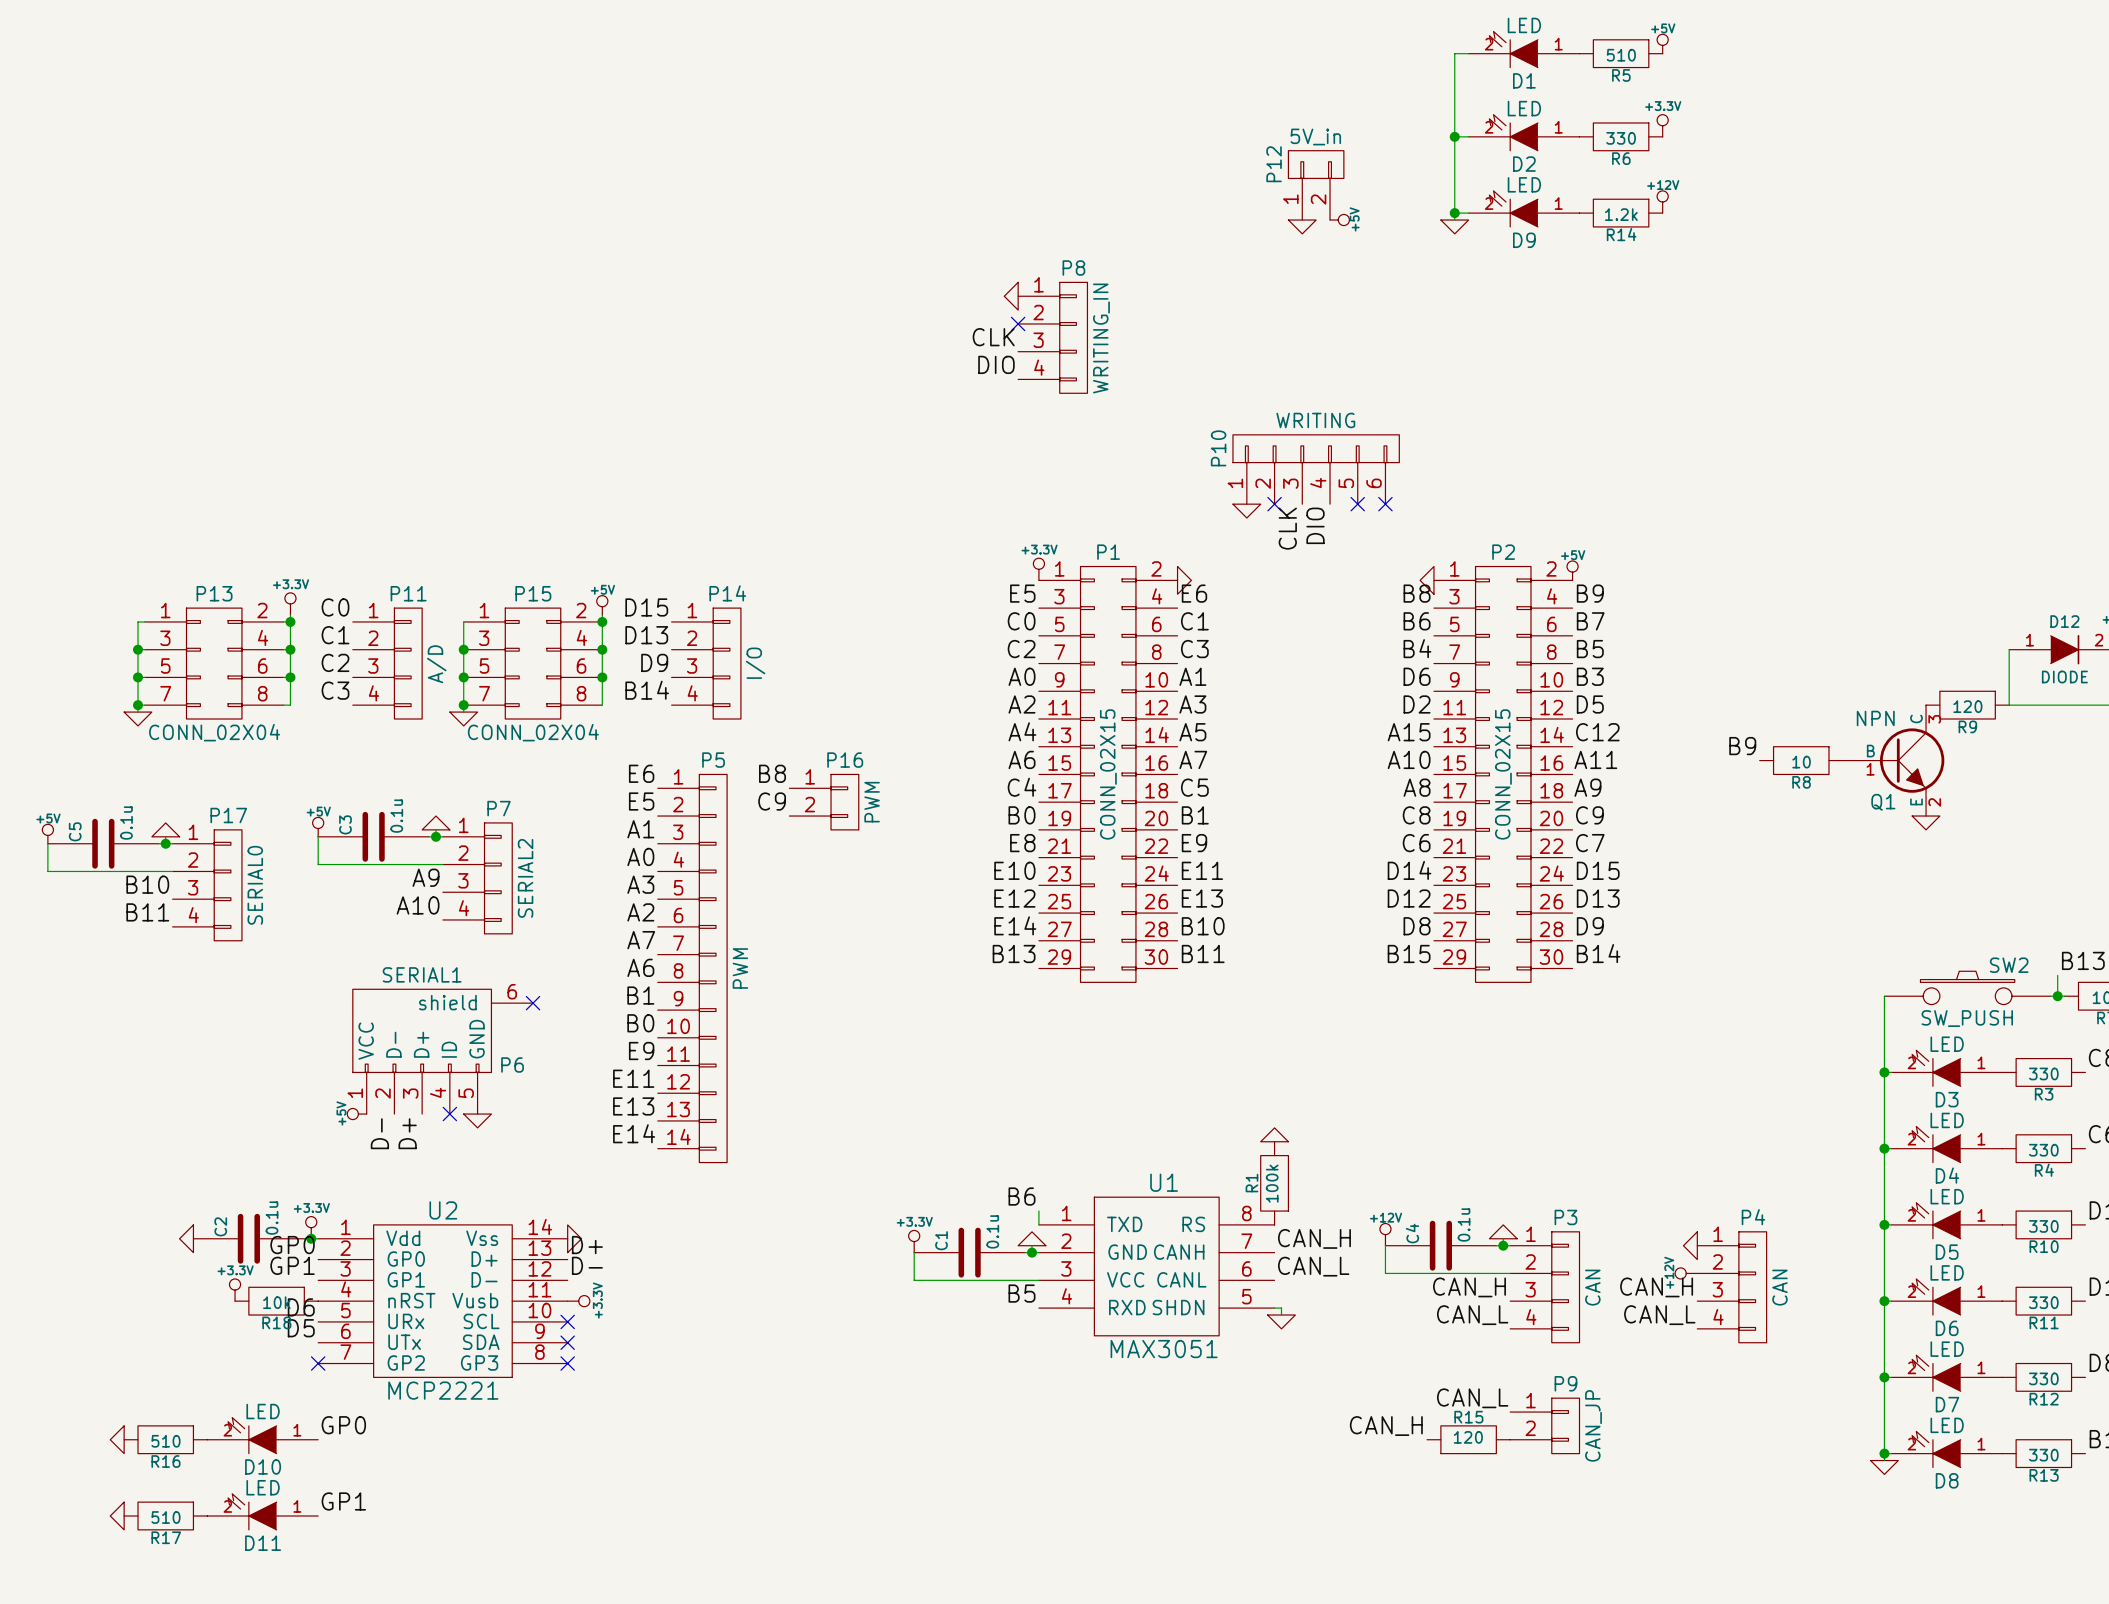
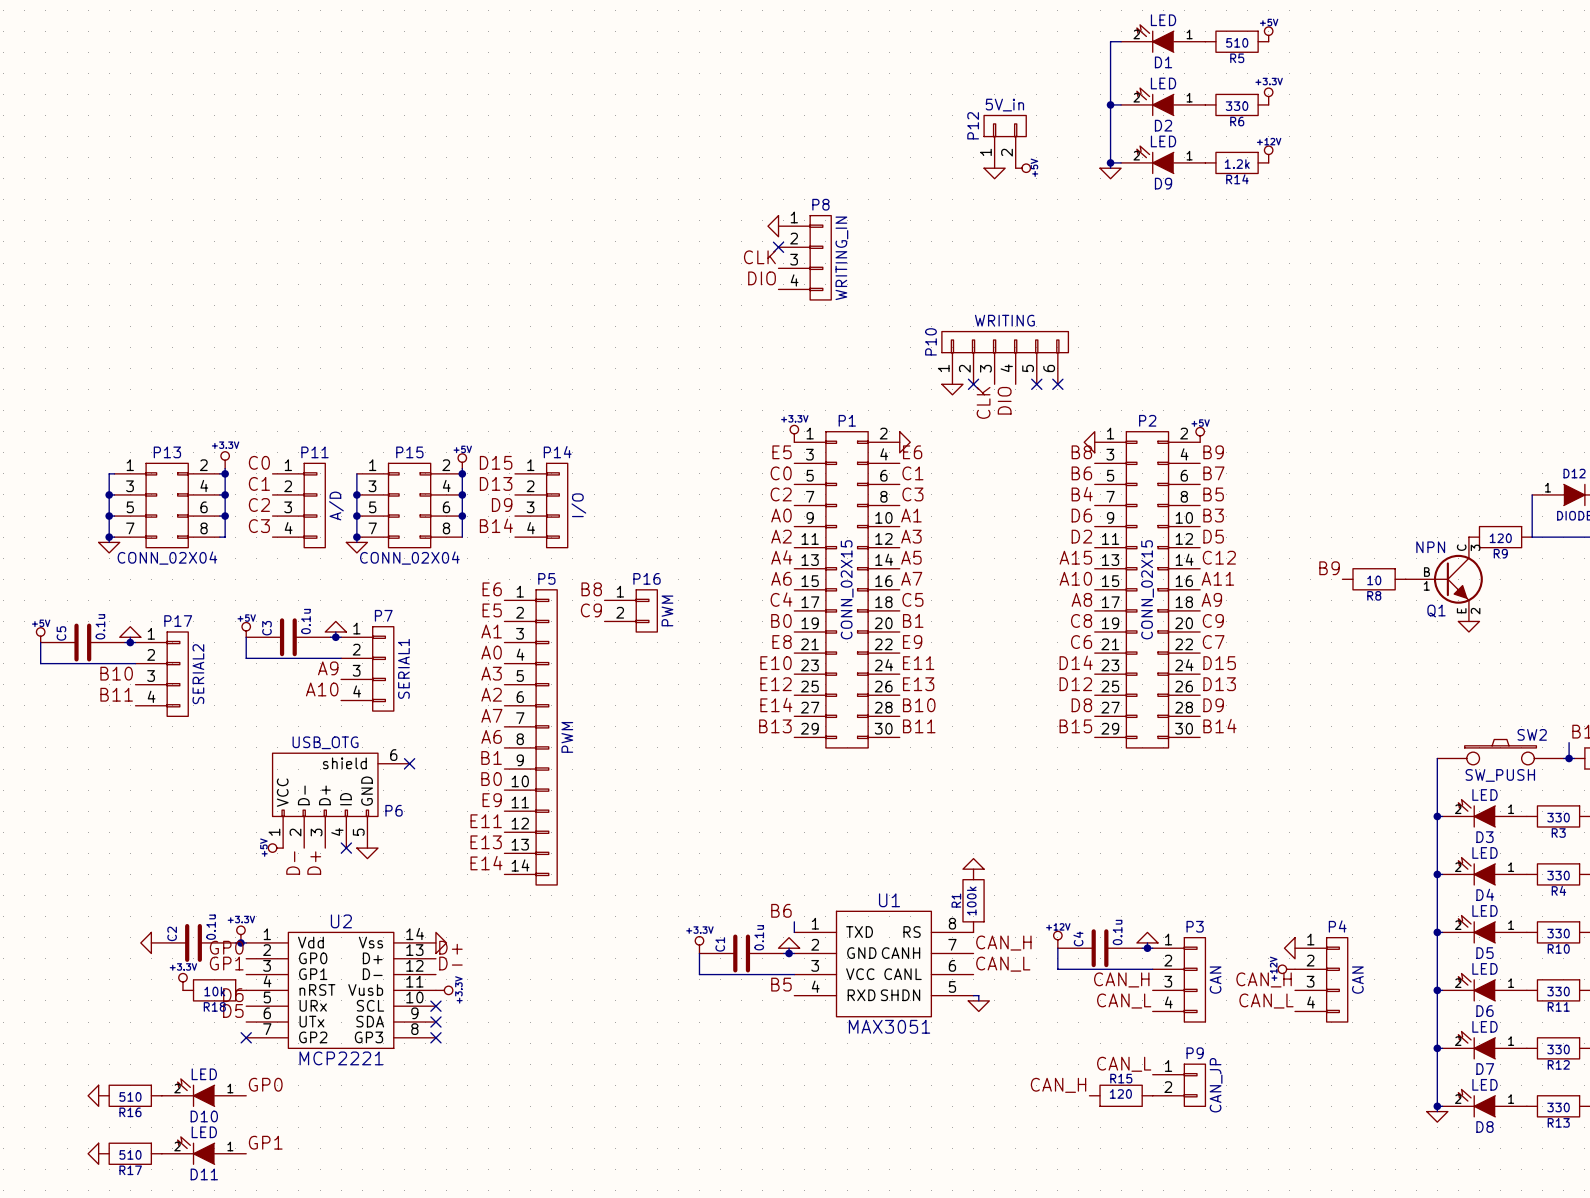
P7 value: SERIAL2 (525, 878) -> SERIAL1 (403, 668)
P17 value: SERIAL0 (255, 885) -> SERIAL2 (198, 674)
P6 value: SERIAL1 (422, 974) -> USB_OTG (325, 742)

